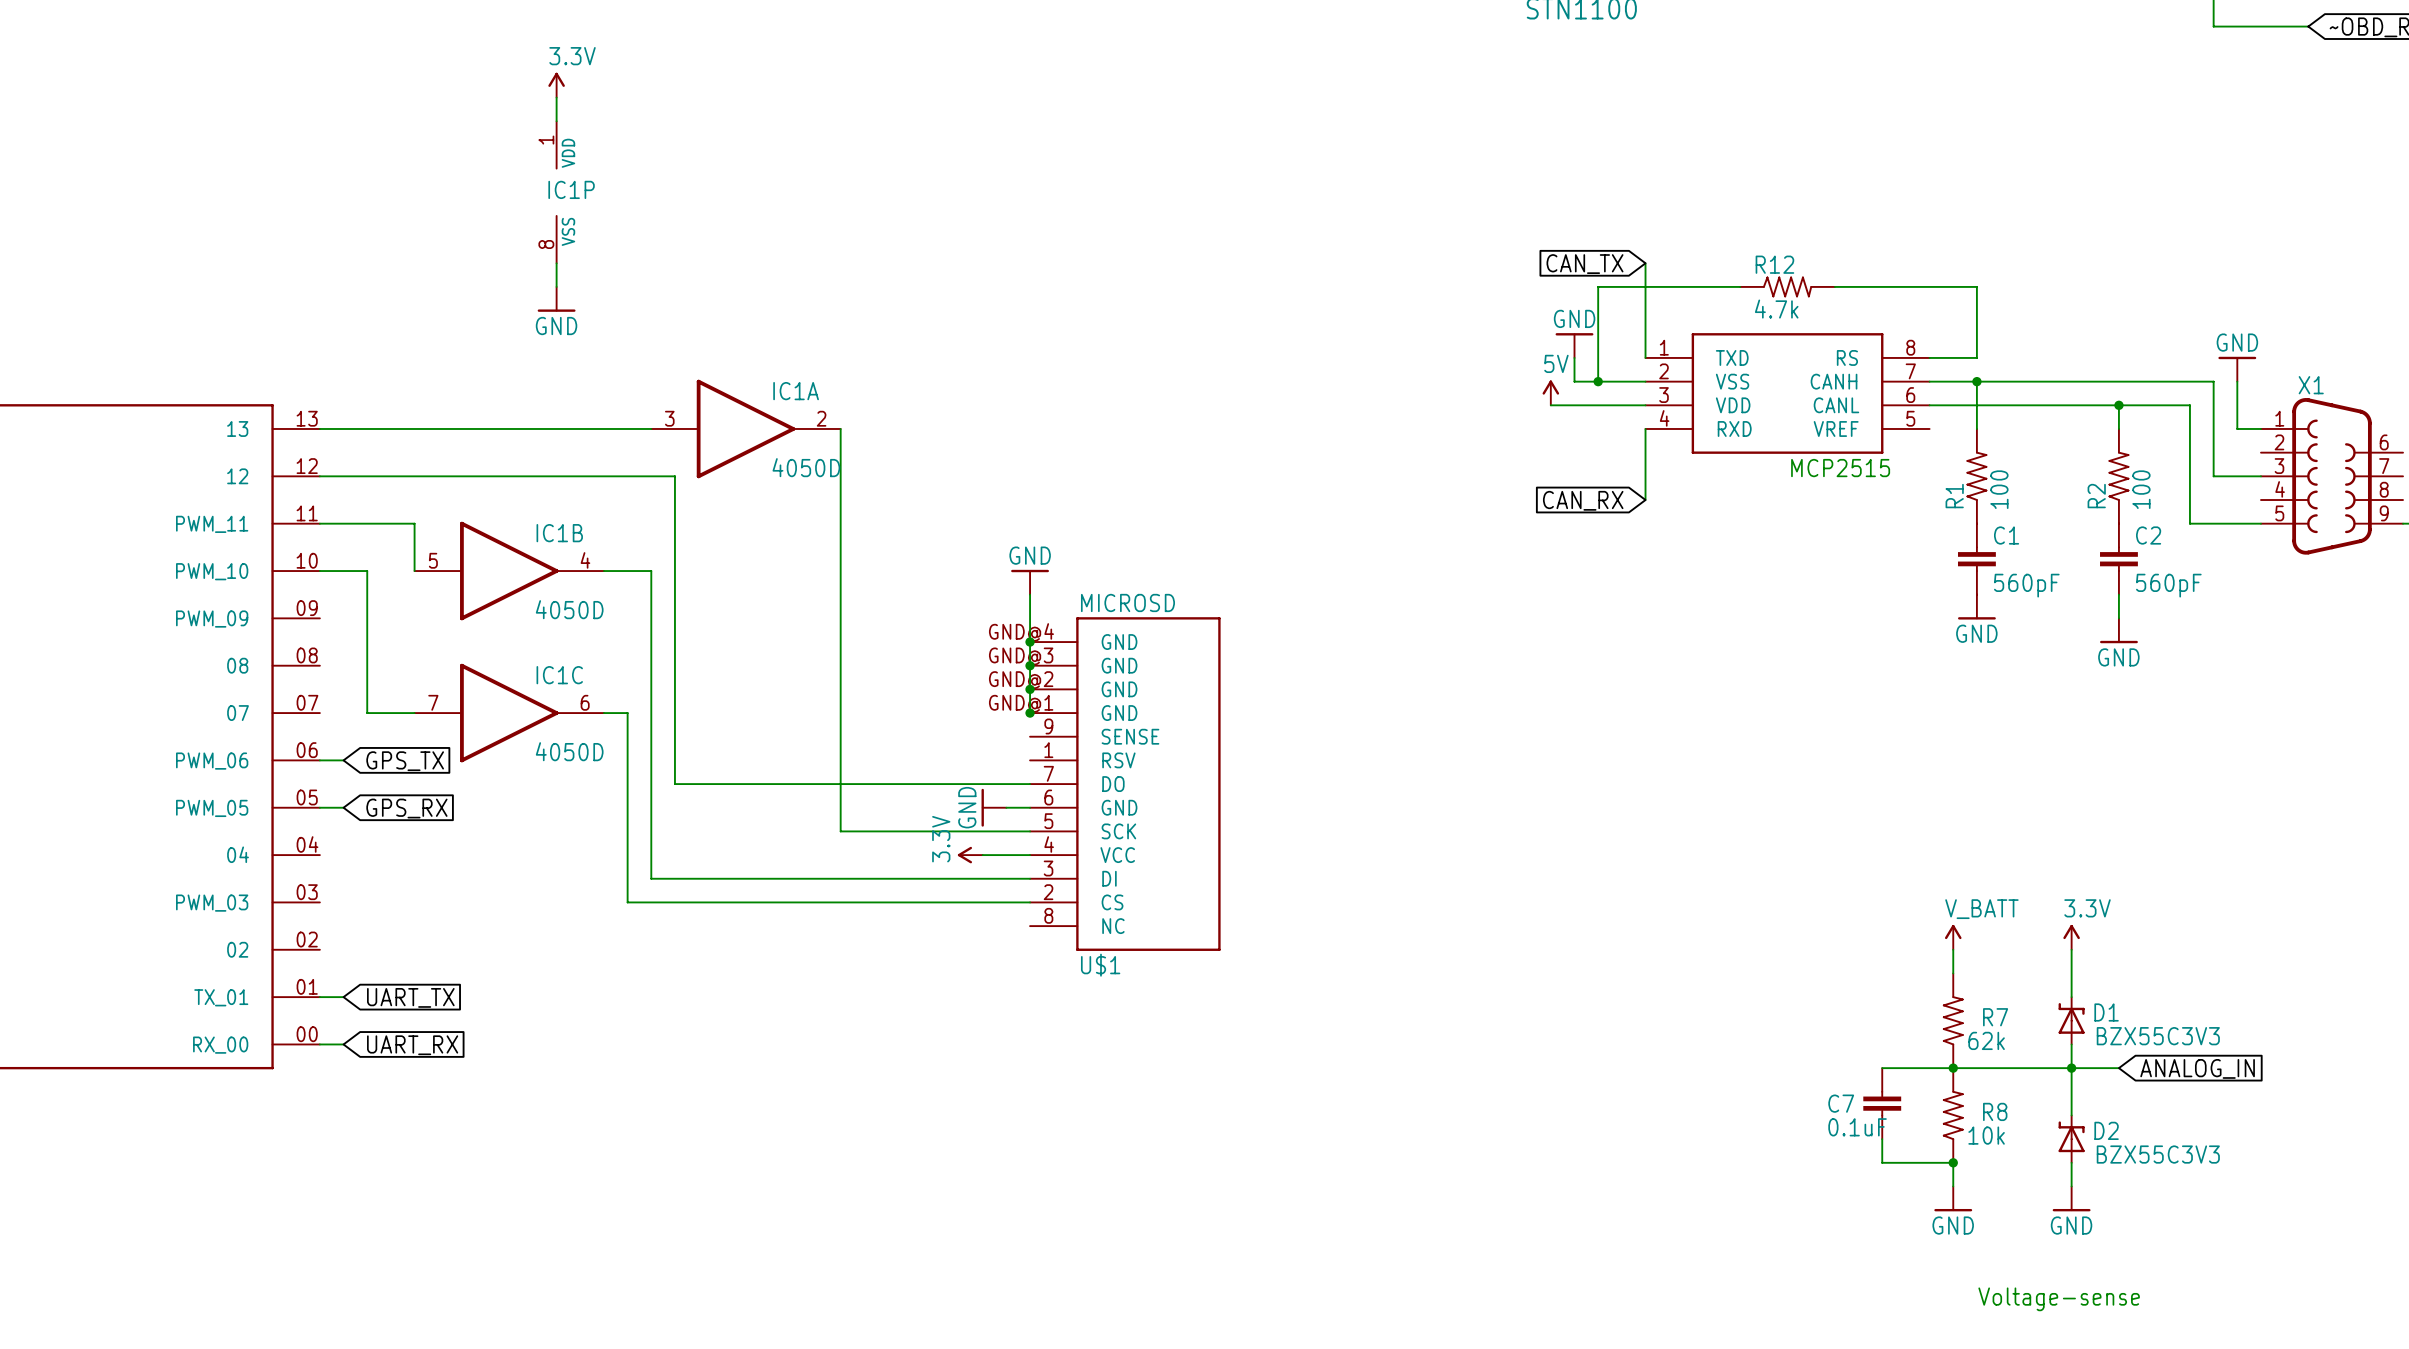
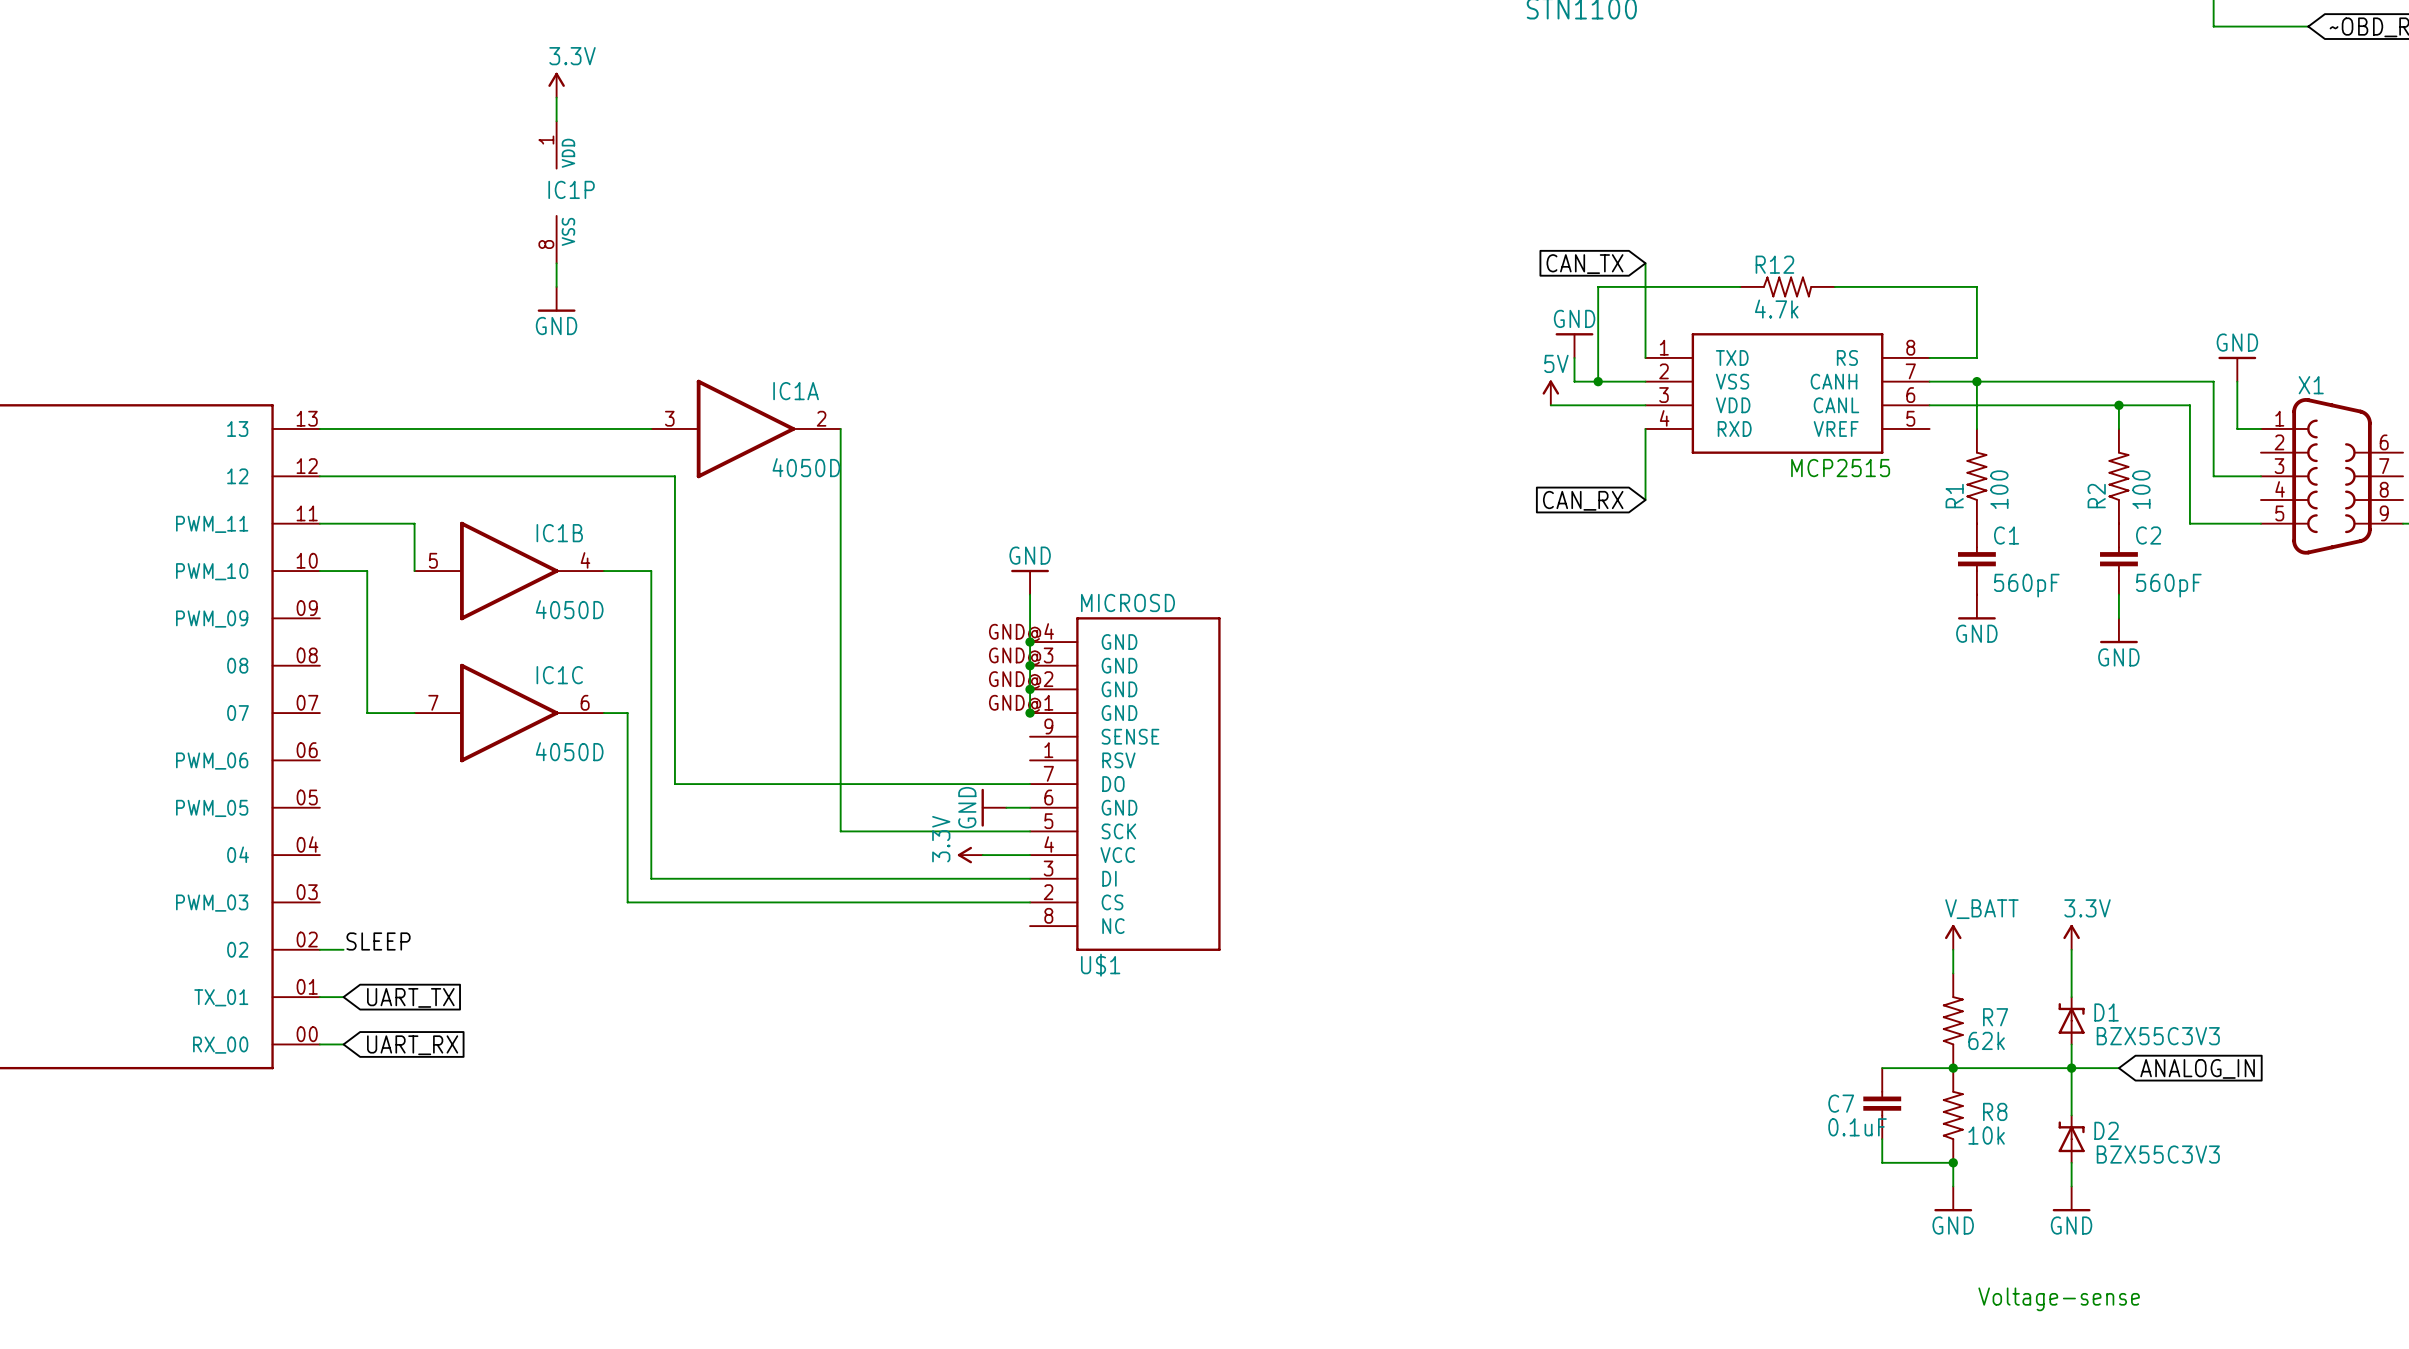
wire: (319, 760) (343, 760) -> none
global label: GPS_TX (405, 761) -> none
wire: (319, 807) (343, 807) -> (319, 949) (343, 949)
global label: GPS_RX (406, 808) -> none
label: none -> SLEEP (378, 941)

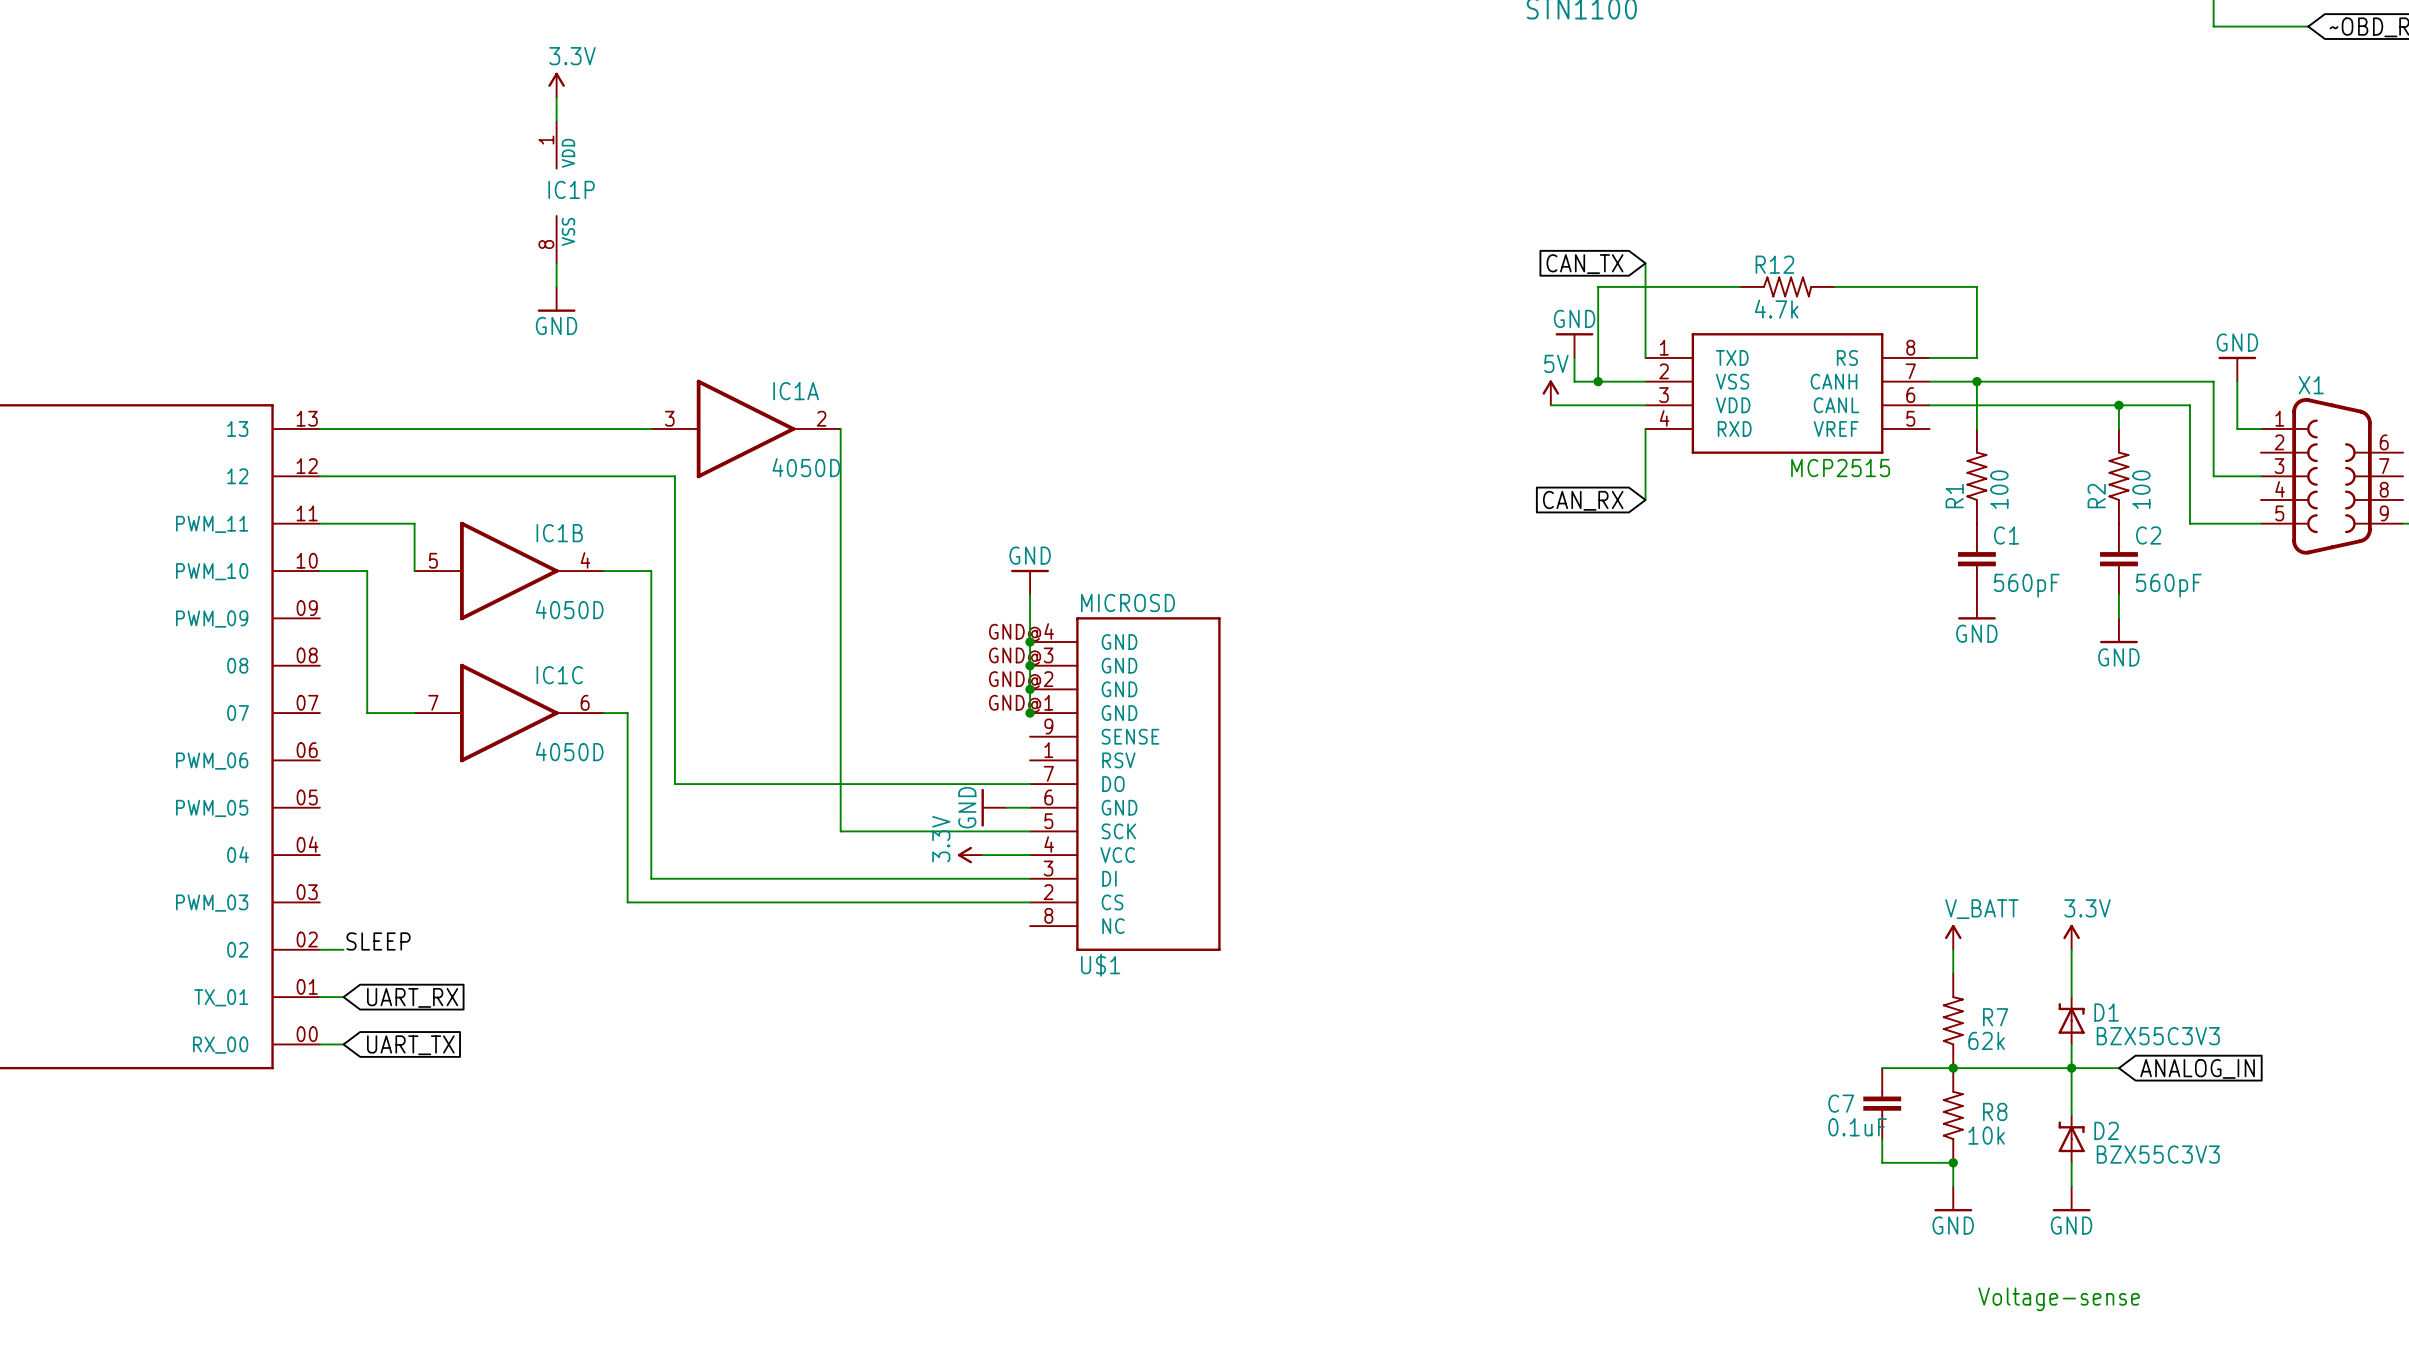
global label: UART_TX (410, 997) -> UART_RX (412, 997)
global label: UART_RX (412, 1045) -> UART_TX (410, 1045)

